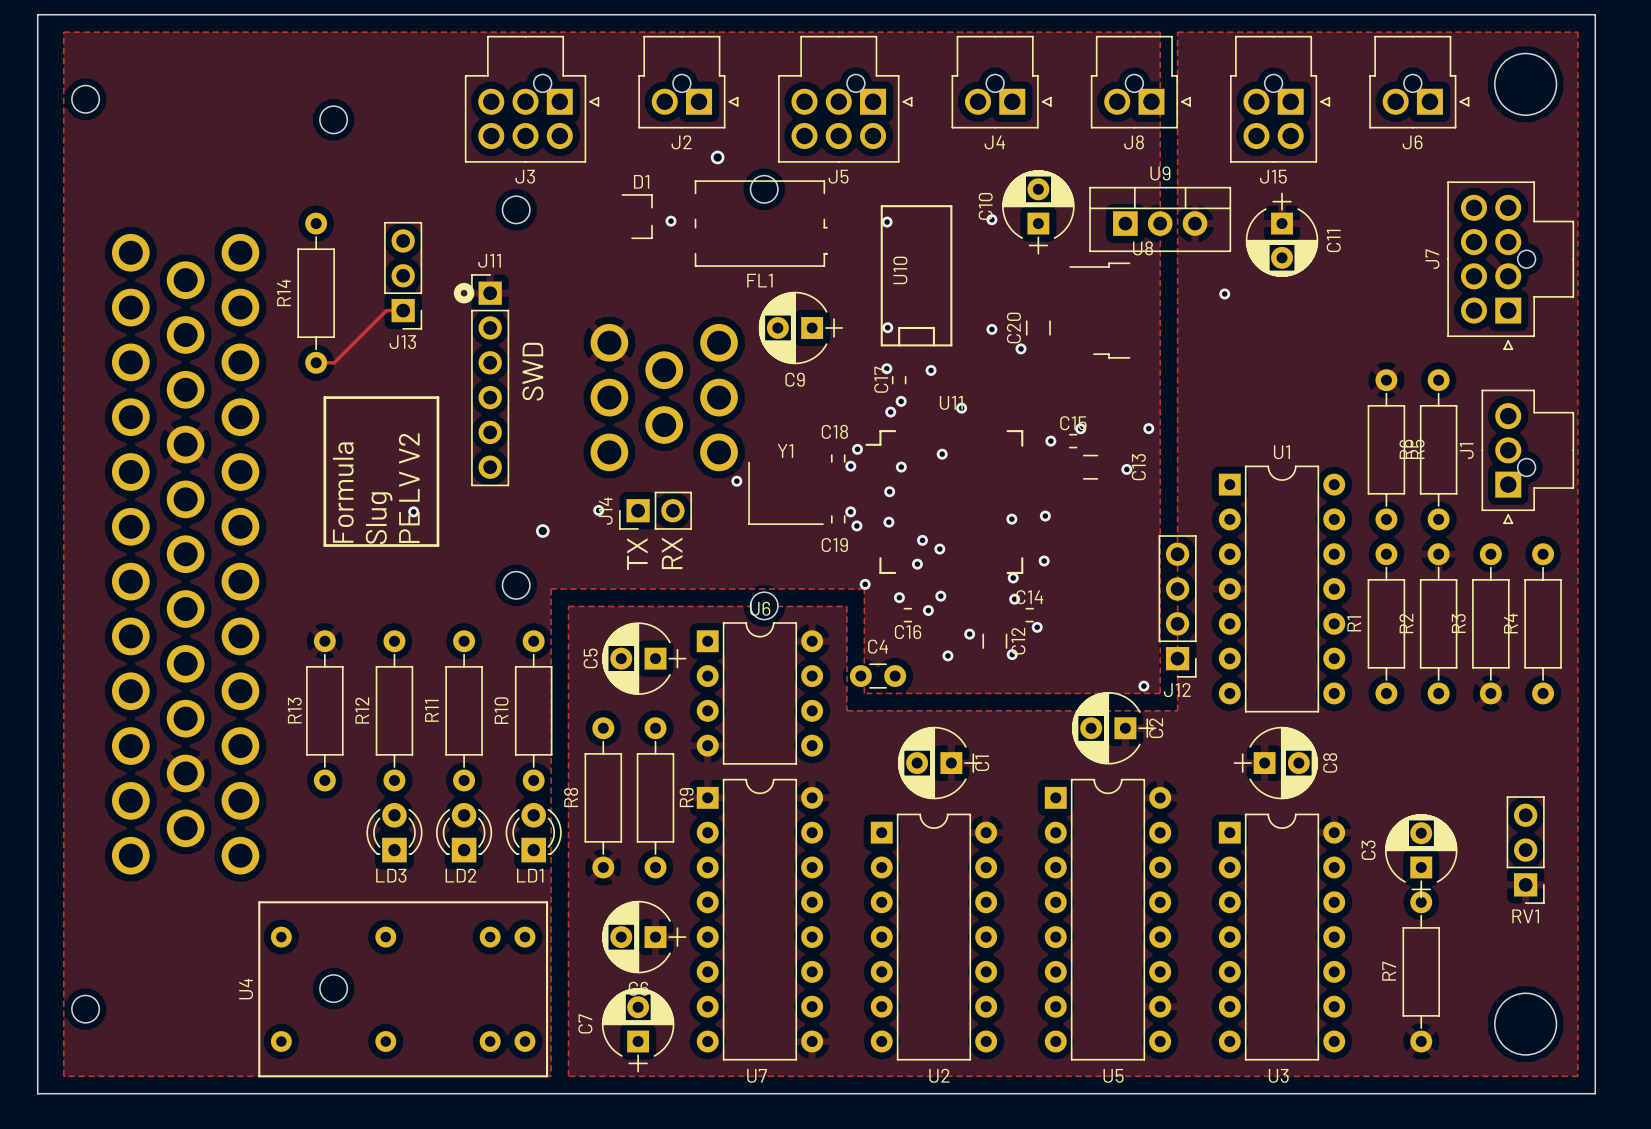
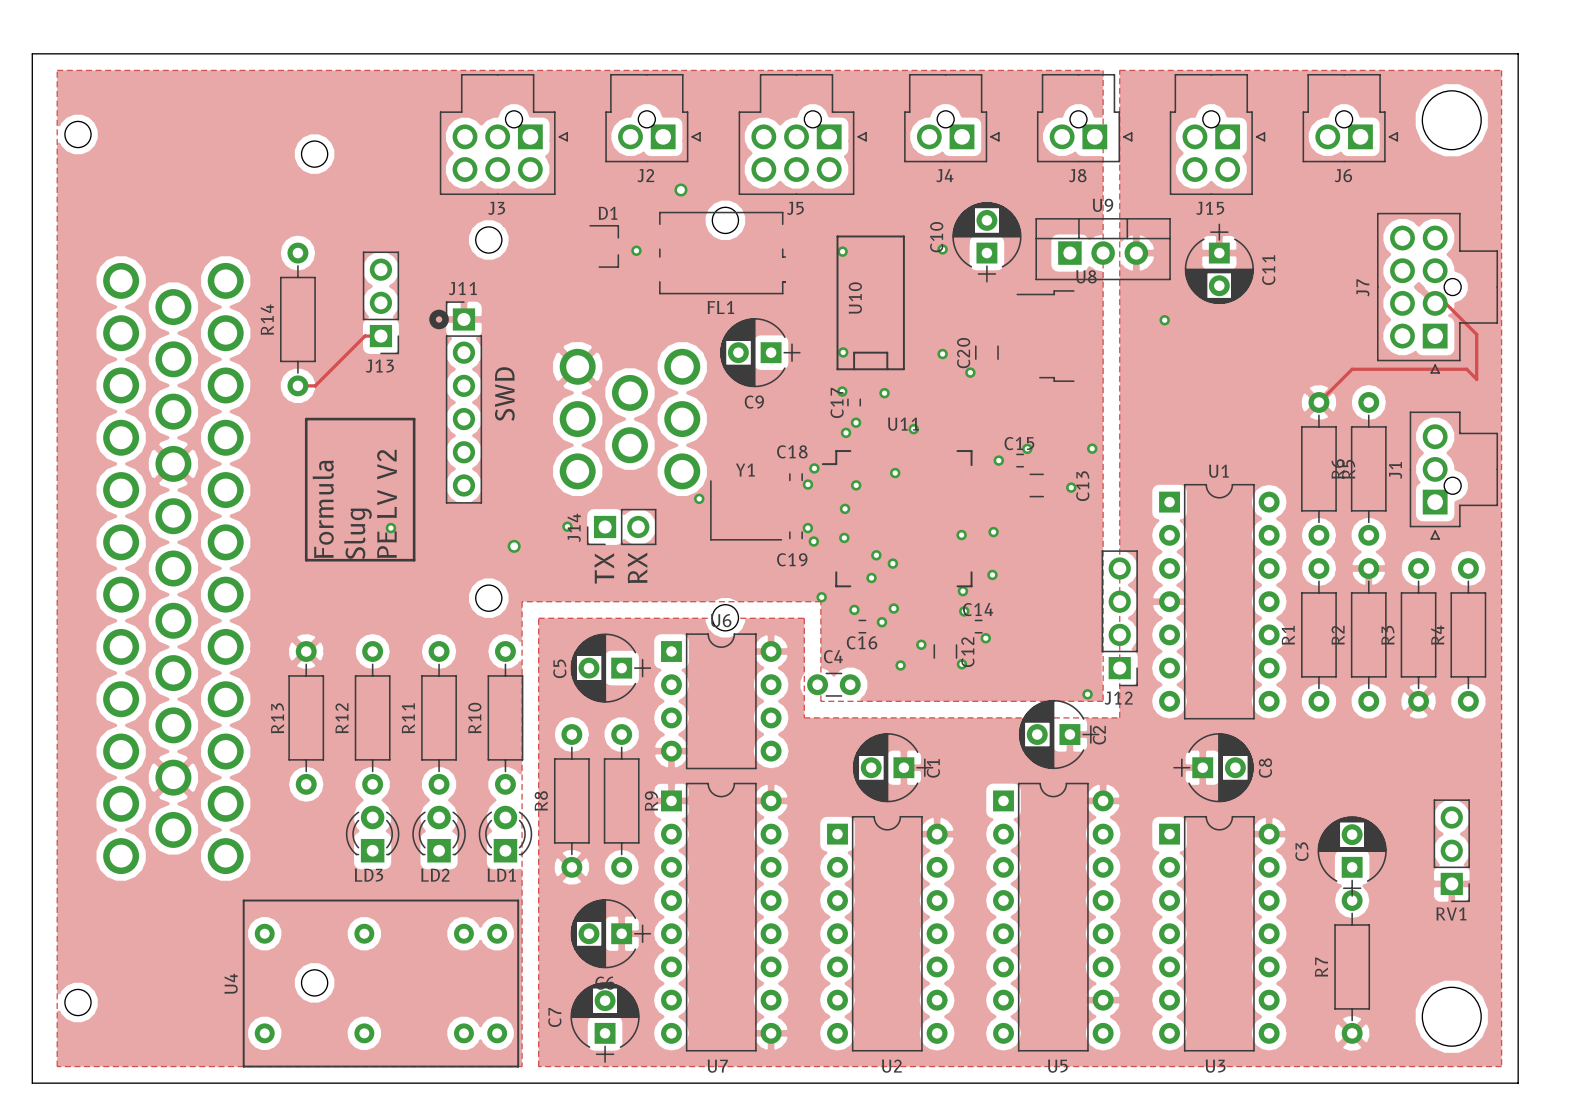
track: none -> (1435, 303) (1445, 303) (1476, 334) (1476, 379) (1466, 369) (1352, 369) (1318, 402)

